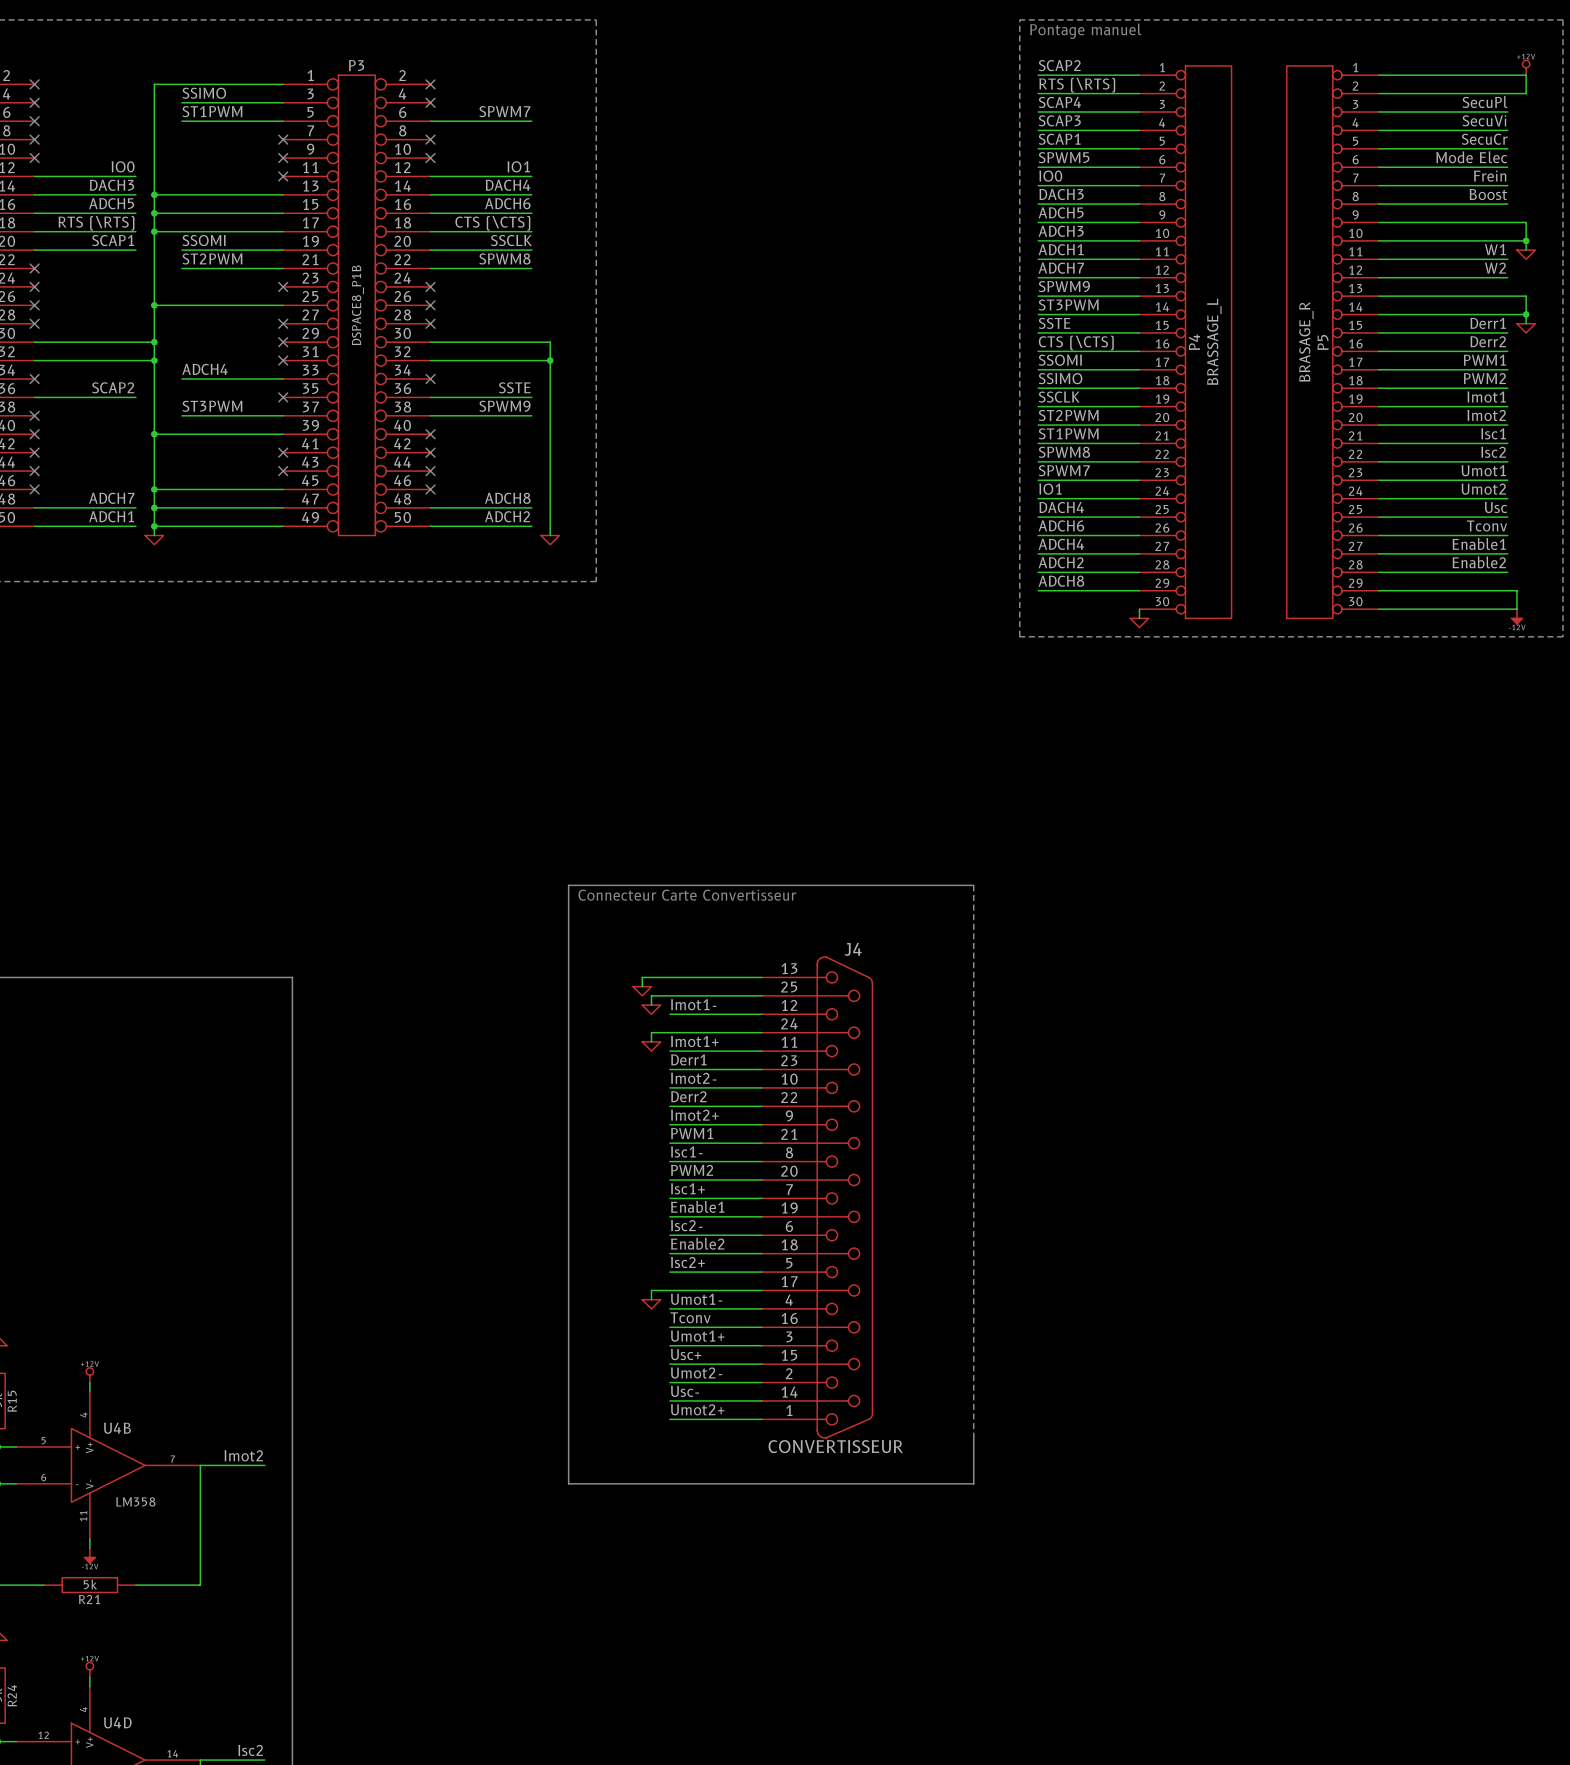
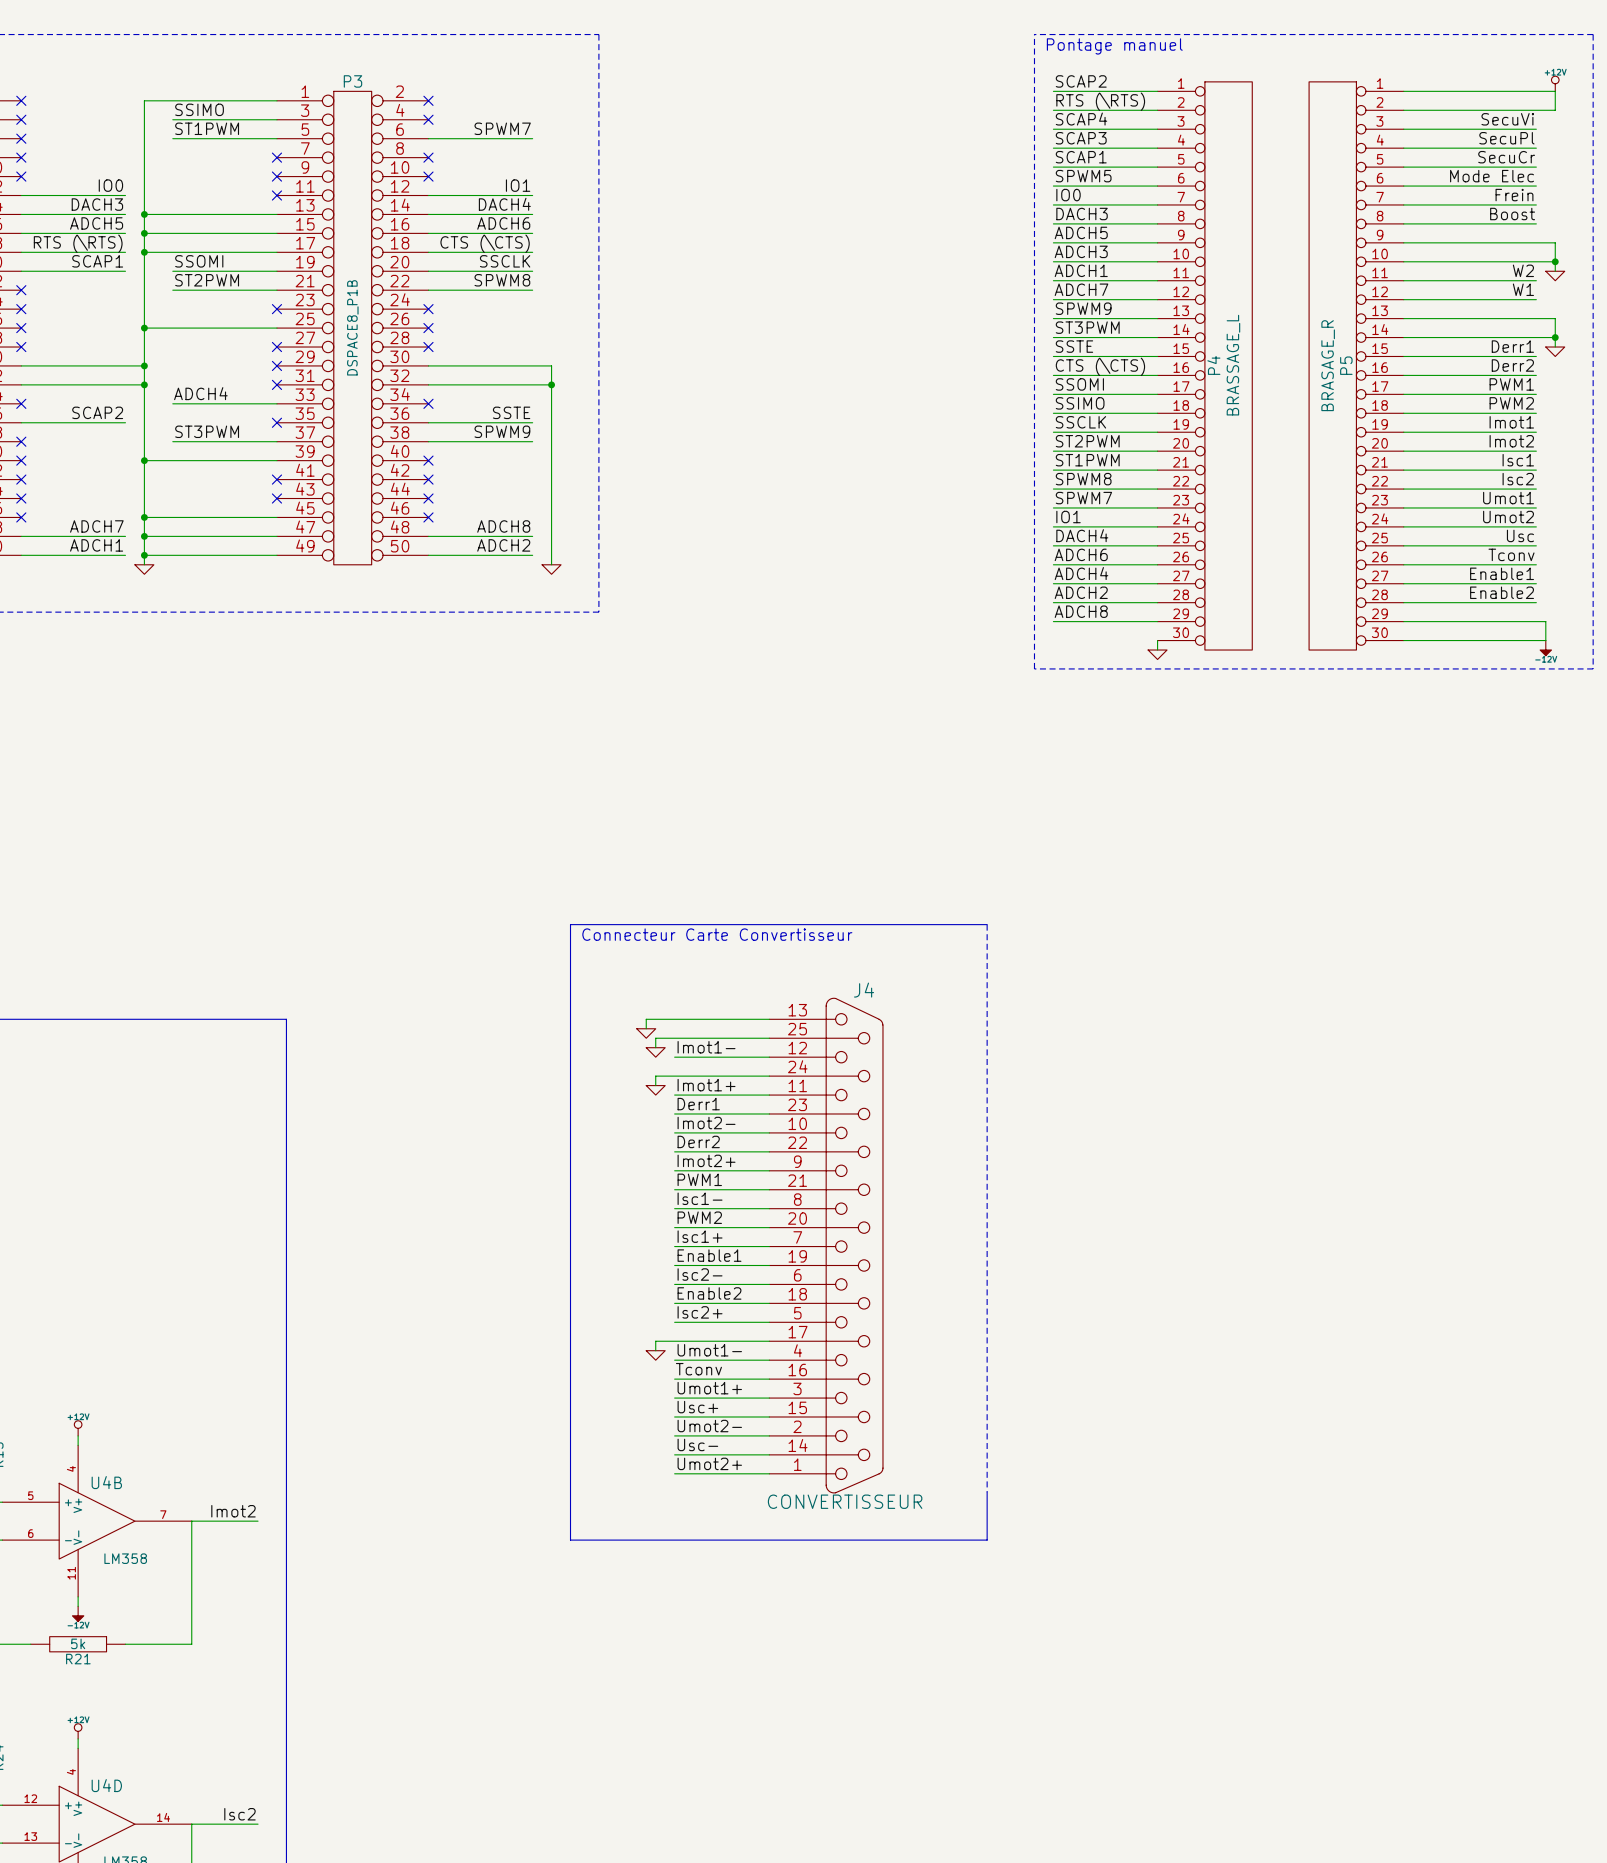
label: SecuPl (1485, 102) -> SecuVi (1507, 119)
label: SecuVi (1484, 120) -> SecuPl (1506, 138)
label: W1 (1495, 249) -> W2 (1523, 270)
label: W2 (1495, 268) -> W1 (1523, 289)

